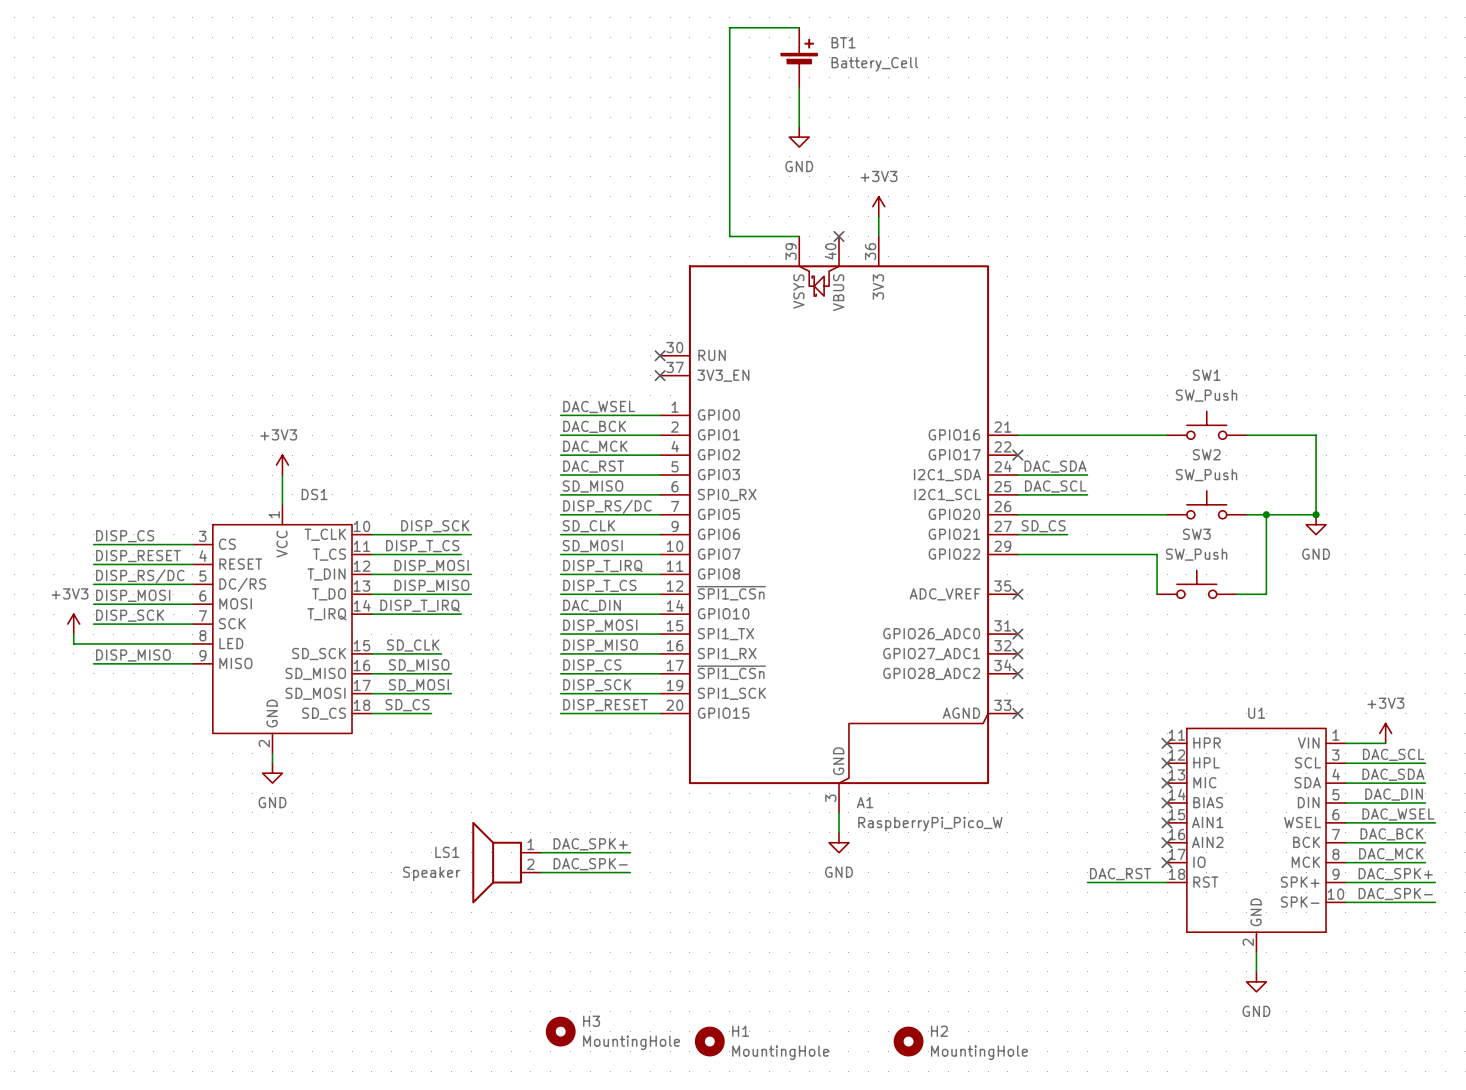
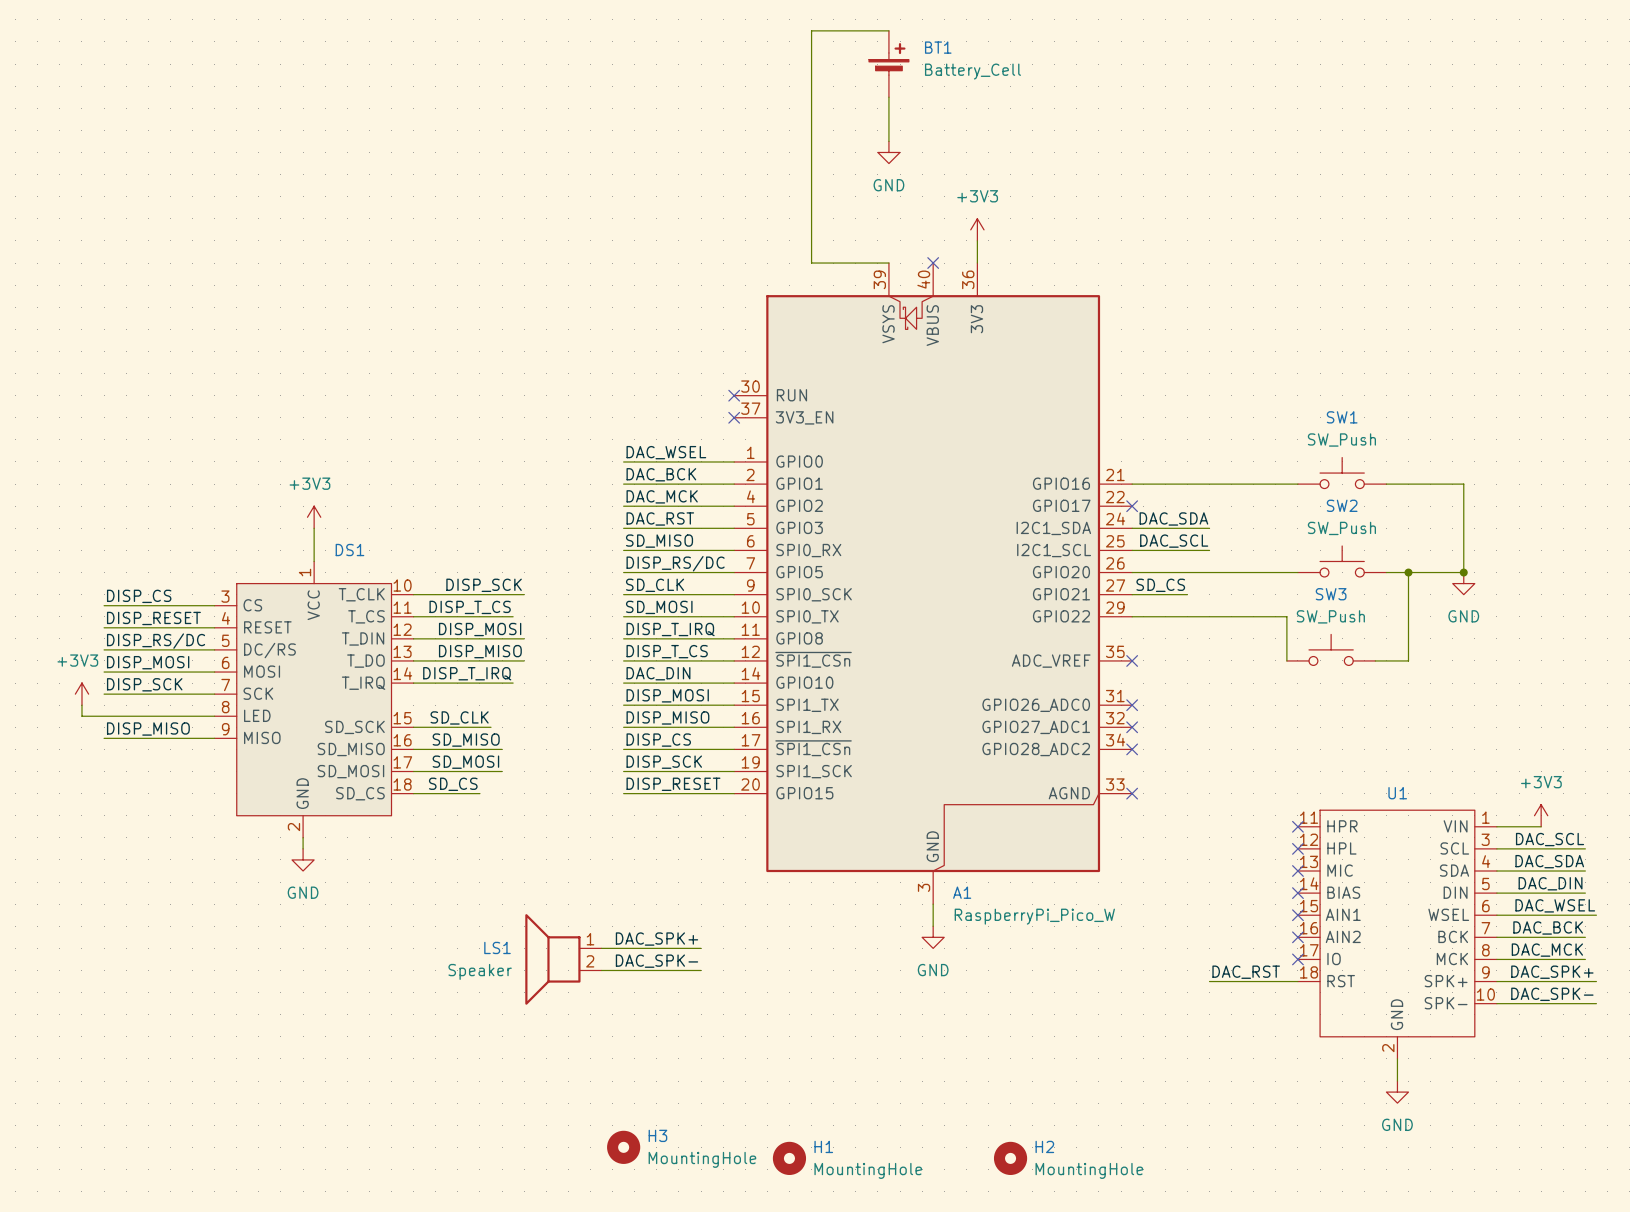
A1 pin name: GPIO6 (718, 534) -> SPI0_SCK (814, 594)
A1 pin name: GPIO7 (719, 554) -> SPI0_TX (807, 616)

